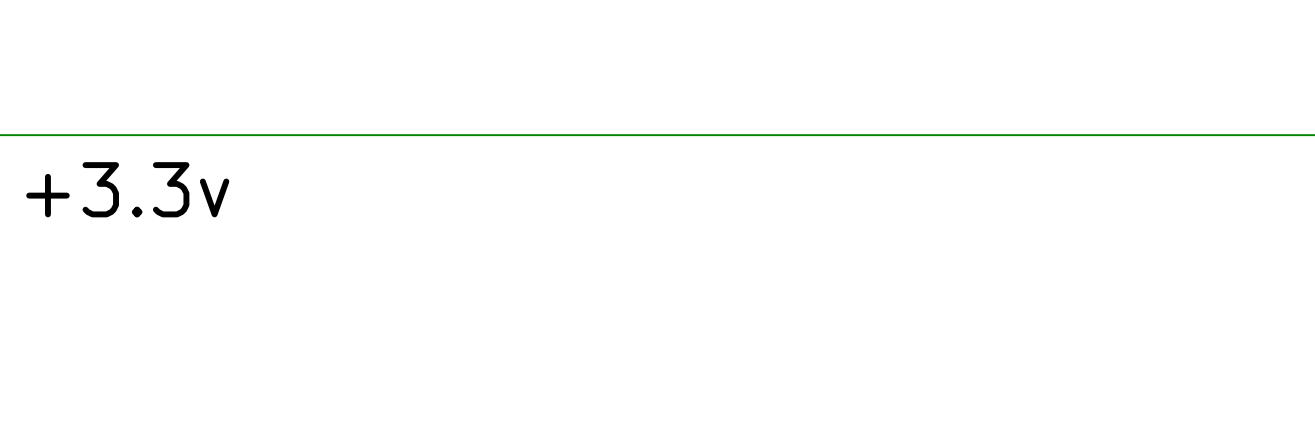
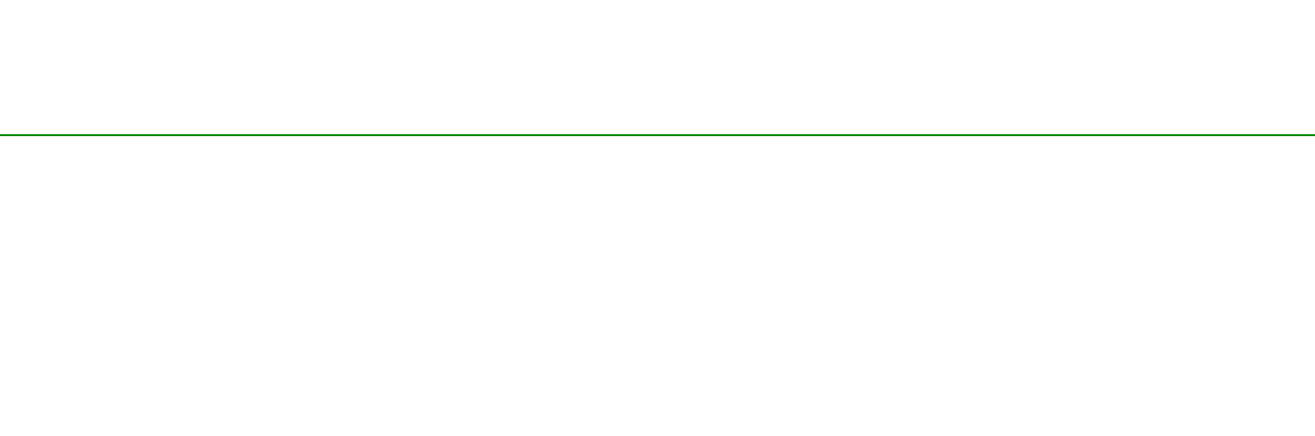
label: +3.3v (127, 189) -> none

